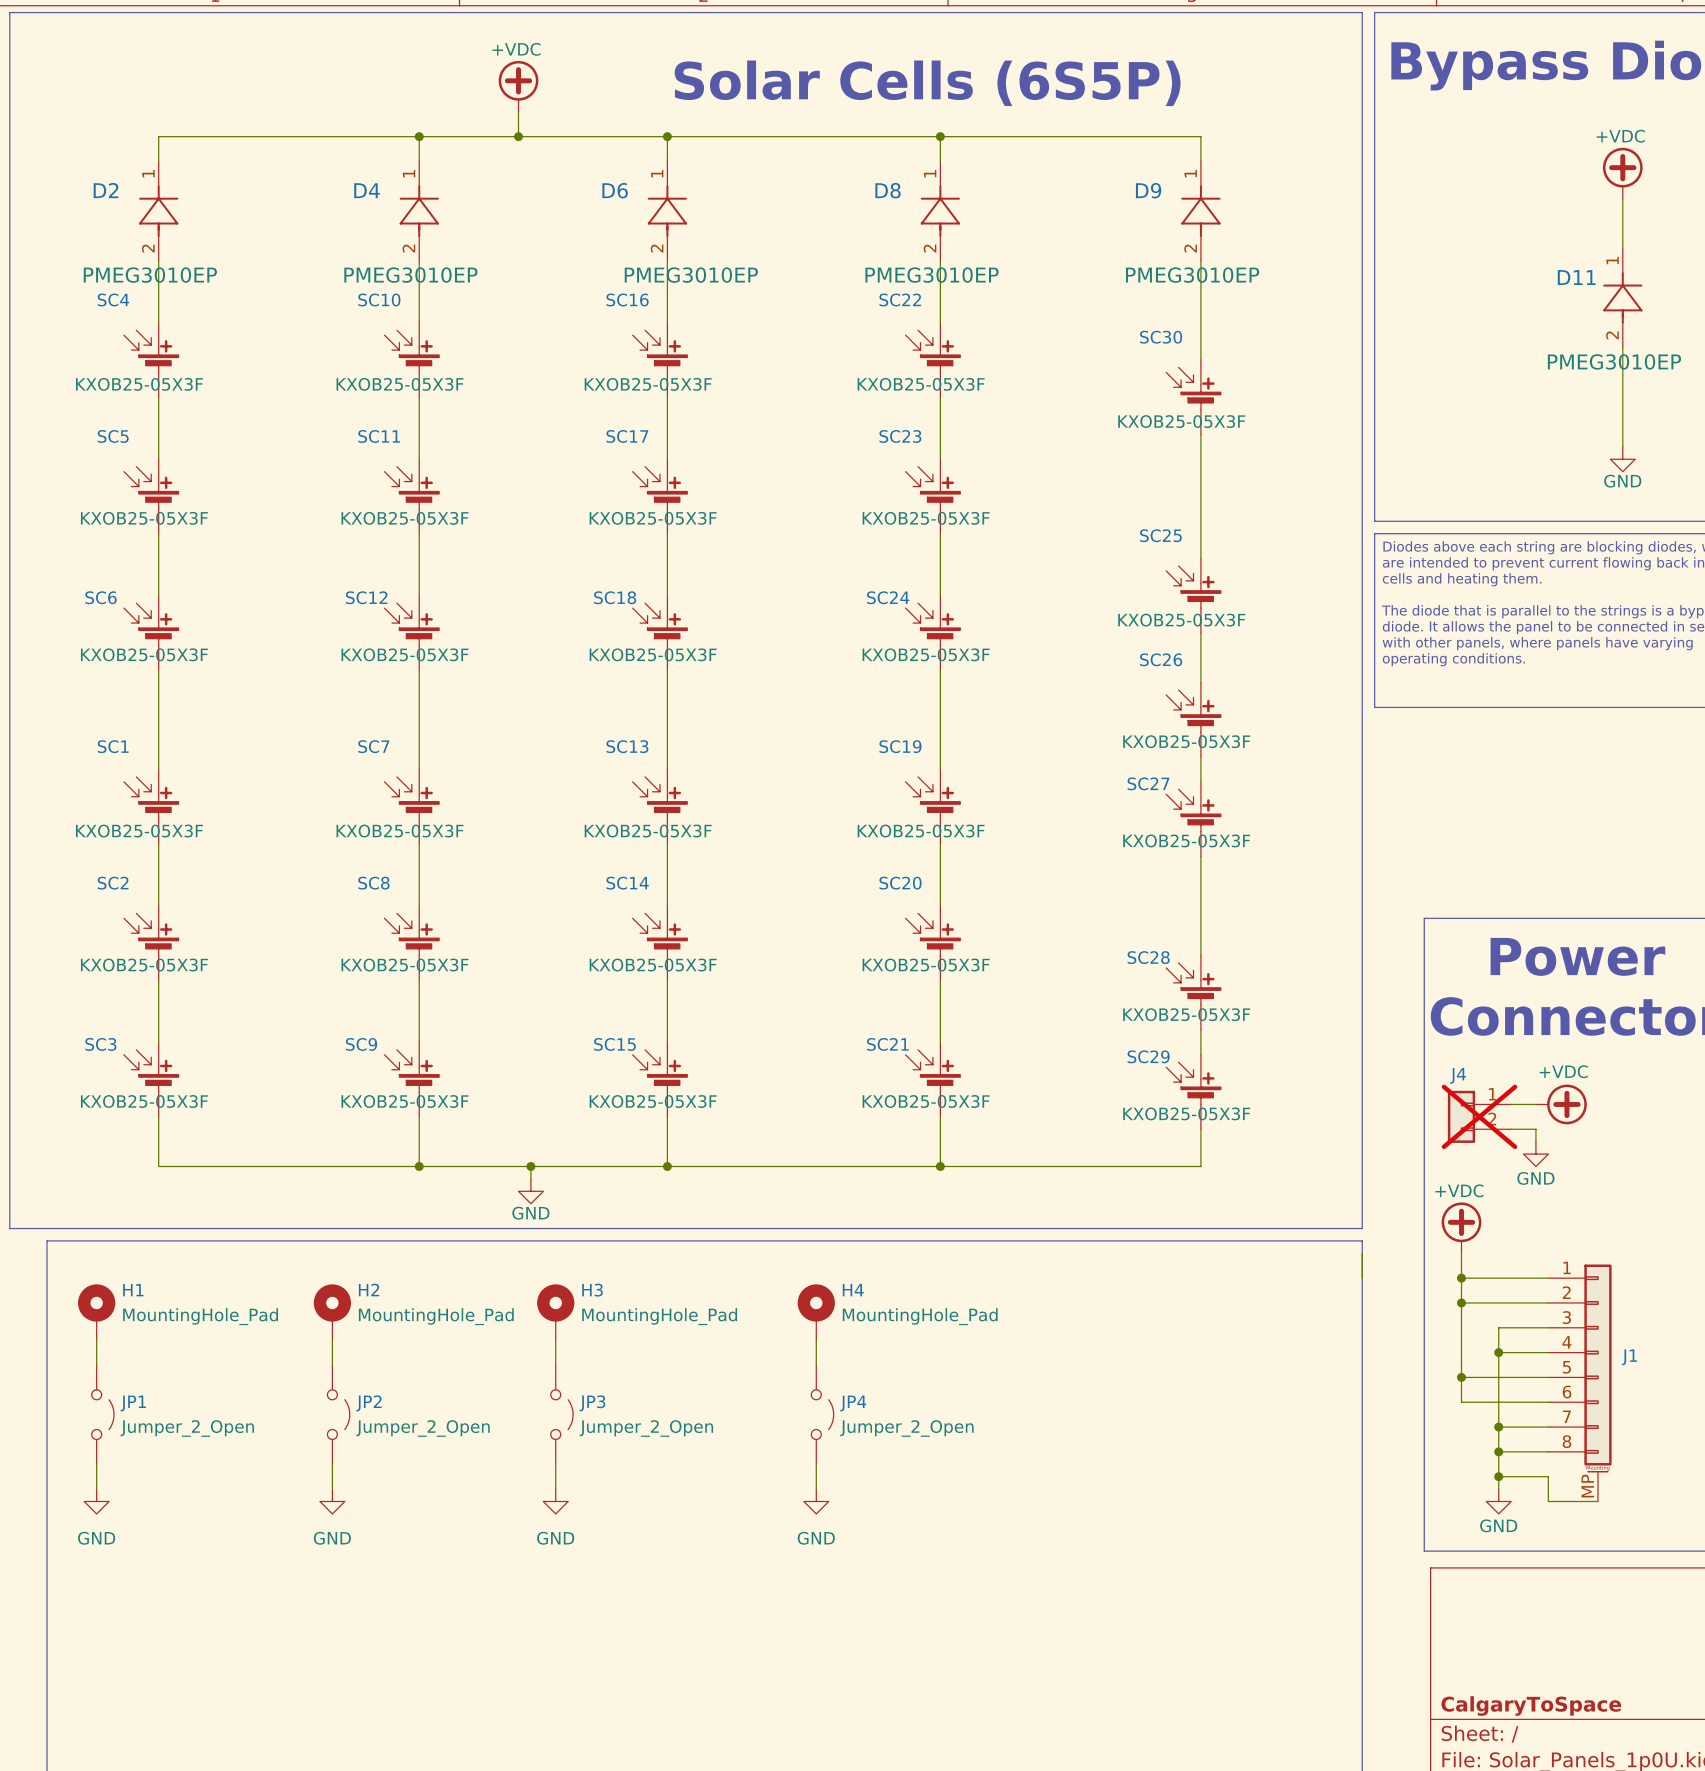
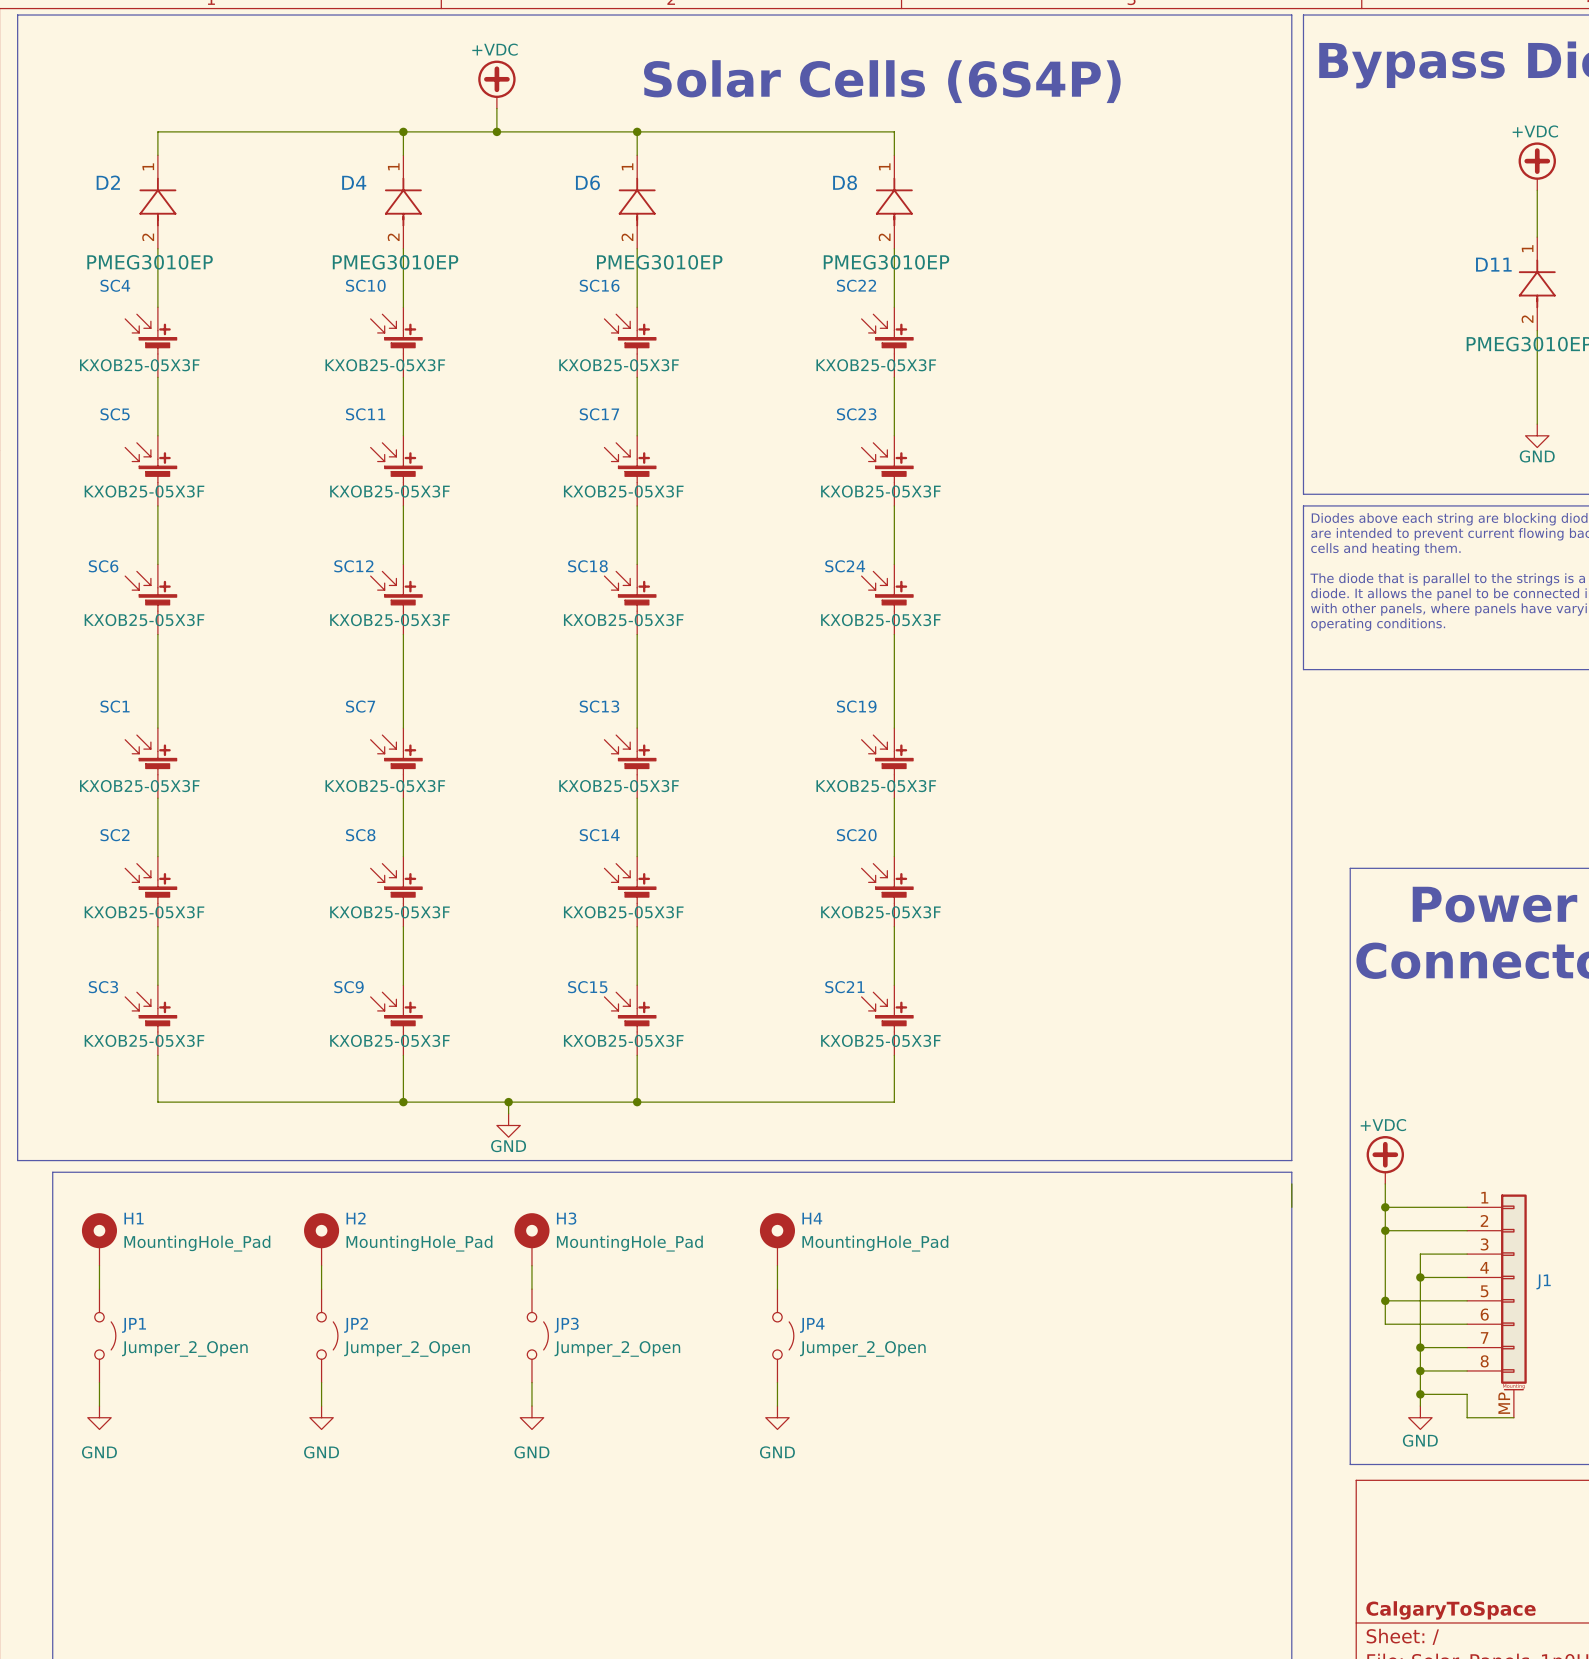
text: Solar Cells (6S5P) (927, 83) -> Solar Cells (6S4P) (882, 81)
wire: (940, 136) (1200, 136) (1200, 161) -> none
junction: (940, 136) -> none
D9: PMEG3010EP (1200, 211) -> none
wire: (1200, 260) (1200, 359) -> none
SC30: KXOB25-05X3F (1193, 397) -> none
wire: (1200, 434) (1200, 558) -> none
SC25: KXOB25-05X3F (1193, 595) -> none
wire: (1200, 632) (1200, 682) -> none
SC26: KXOB25-05X3F (1193, 719) -> none
wire: (1200, 757) (1200, 781) -> none
SC27: KXOB25-05X3F (1193, 819) -> none
wire: (1200, 856) (1200, 955) -> none
SC28: KXOB25-05X3F (1193, 992) -> none
wire: (1200, 1030) (1200, 1054) -> none
SC29: KXOB25-05X3F (1193, 1092) -> none
wire: (1511, 1104) (1535, 1104) -> none
power symbol: +VDC (1561, 1104) -> none
J4: (1479, 1116) -> none
wire: (1200, 1129) (1200, 1166) (940, 1166) -> none
wire: (1511, 1129) (1535, 1129) (1535, 1141) -> none
power symbol: GND (1535, 1154) -> none
junction: (940, 1166) -> none

